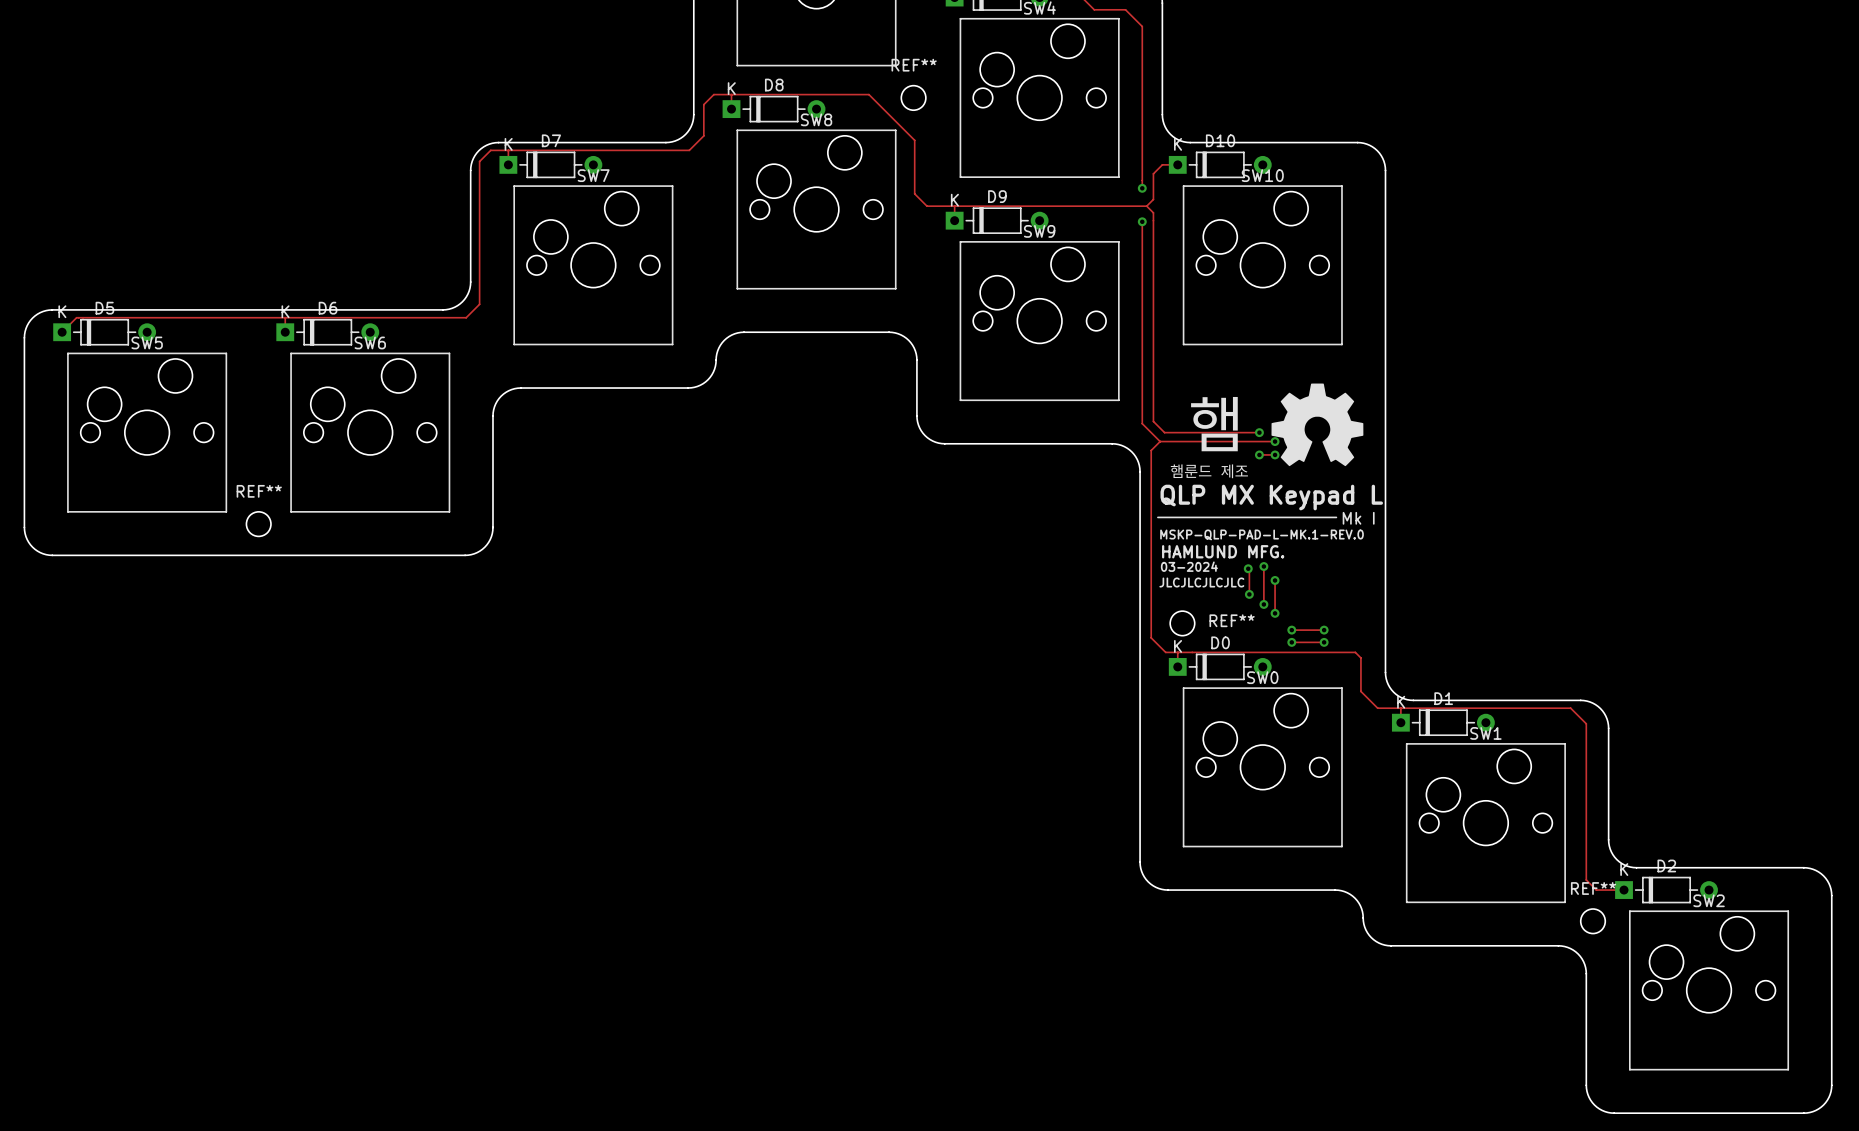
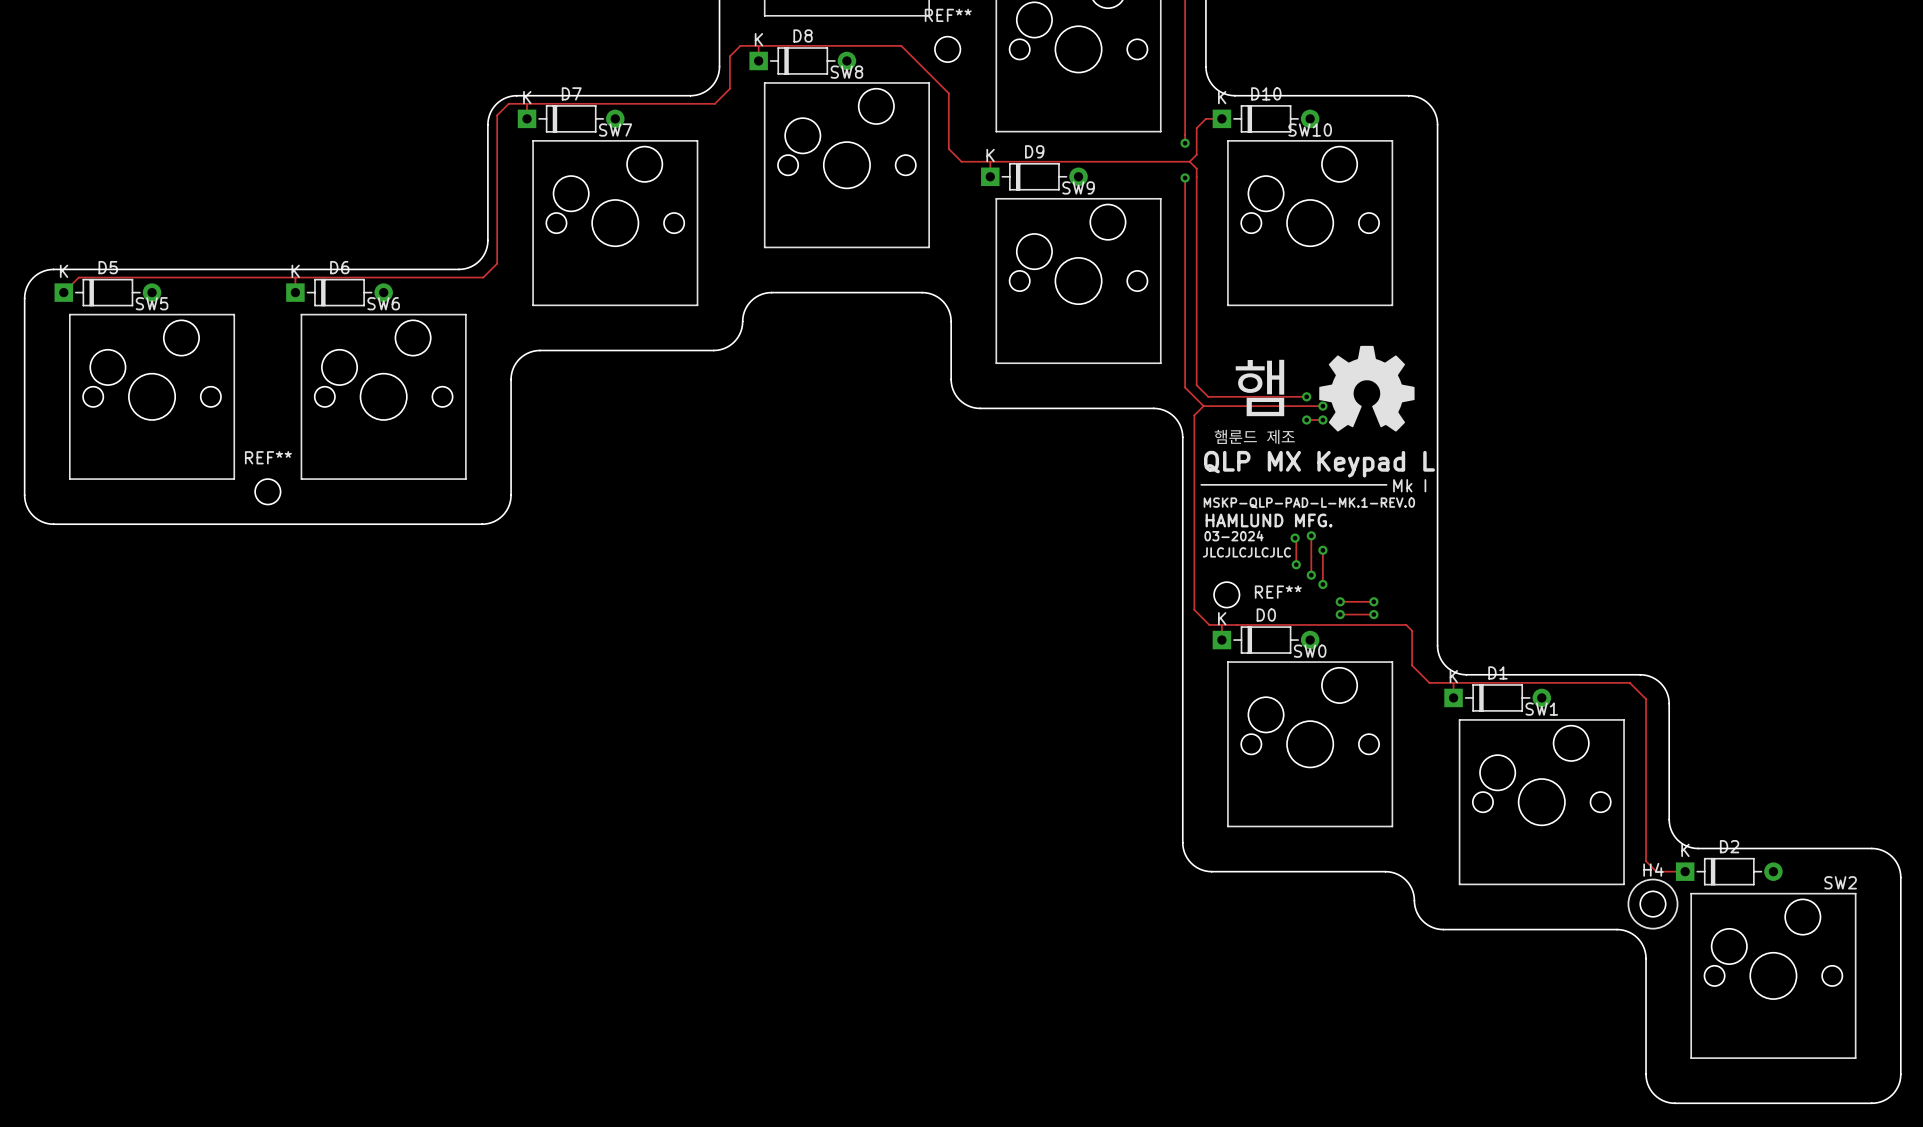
REF** name: REF** (1593, 888) -> H4 (1653, 869)
drawing: none -> [1627, 878, 1679, 930]
SW2 name position: SW2 (1709, 900) -> SW2 (1840, 882)

